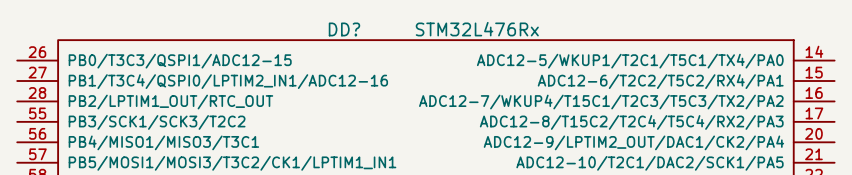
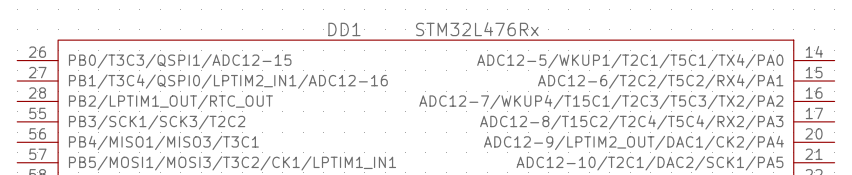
DD? name: DD? (344, 29) -> DD1 (344, 29)

